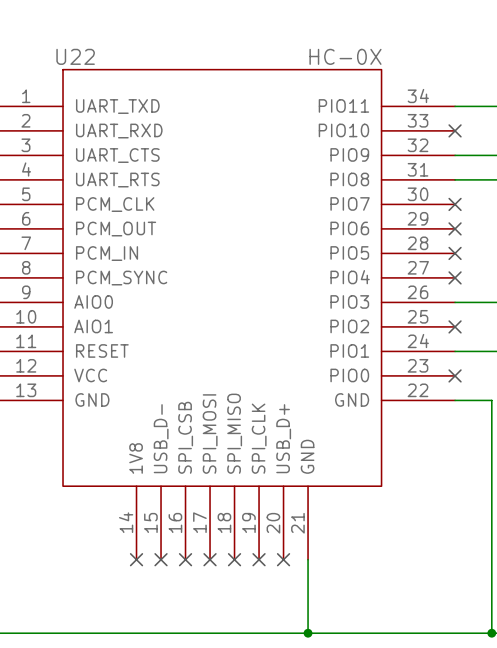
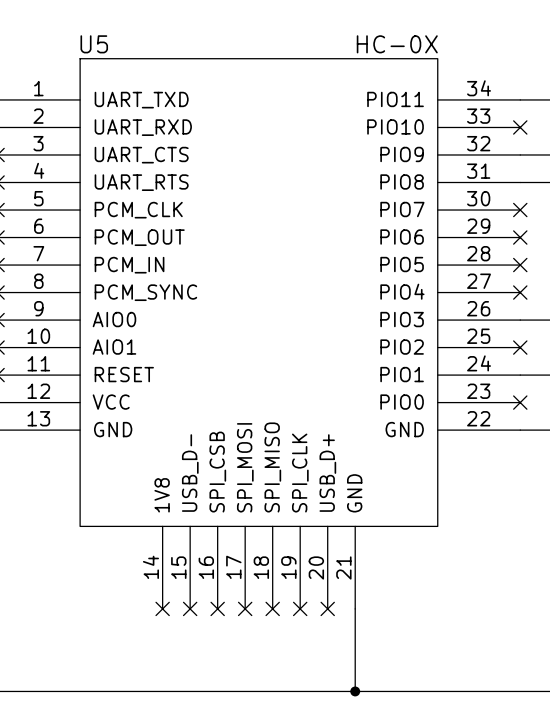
U22 name: U22 (75, 56) -> U5 (94, 44)

